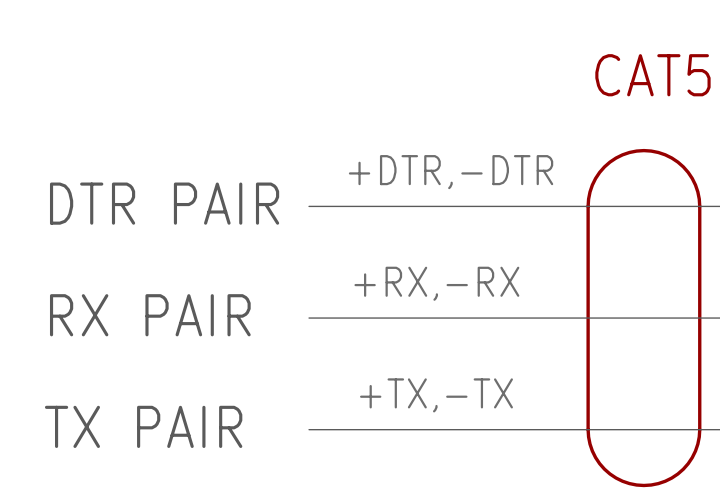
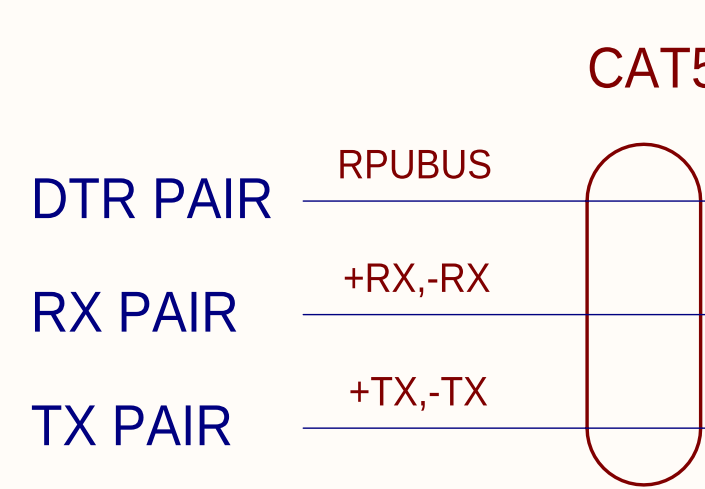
label: +DTR,-DTR (451, 172) -> RPUBUS (415, 164)

